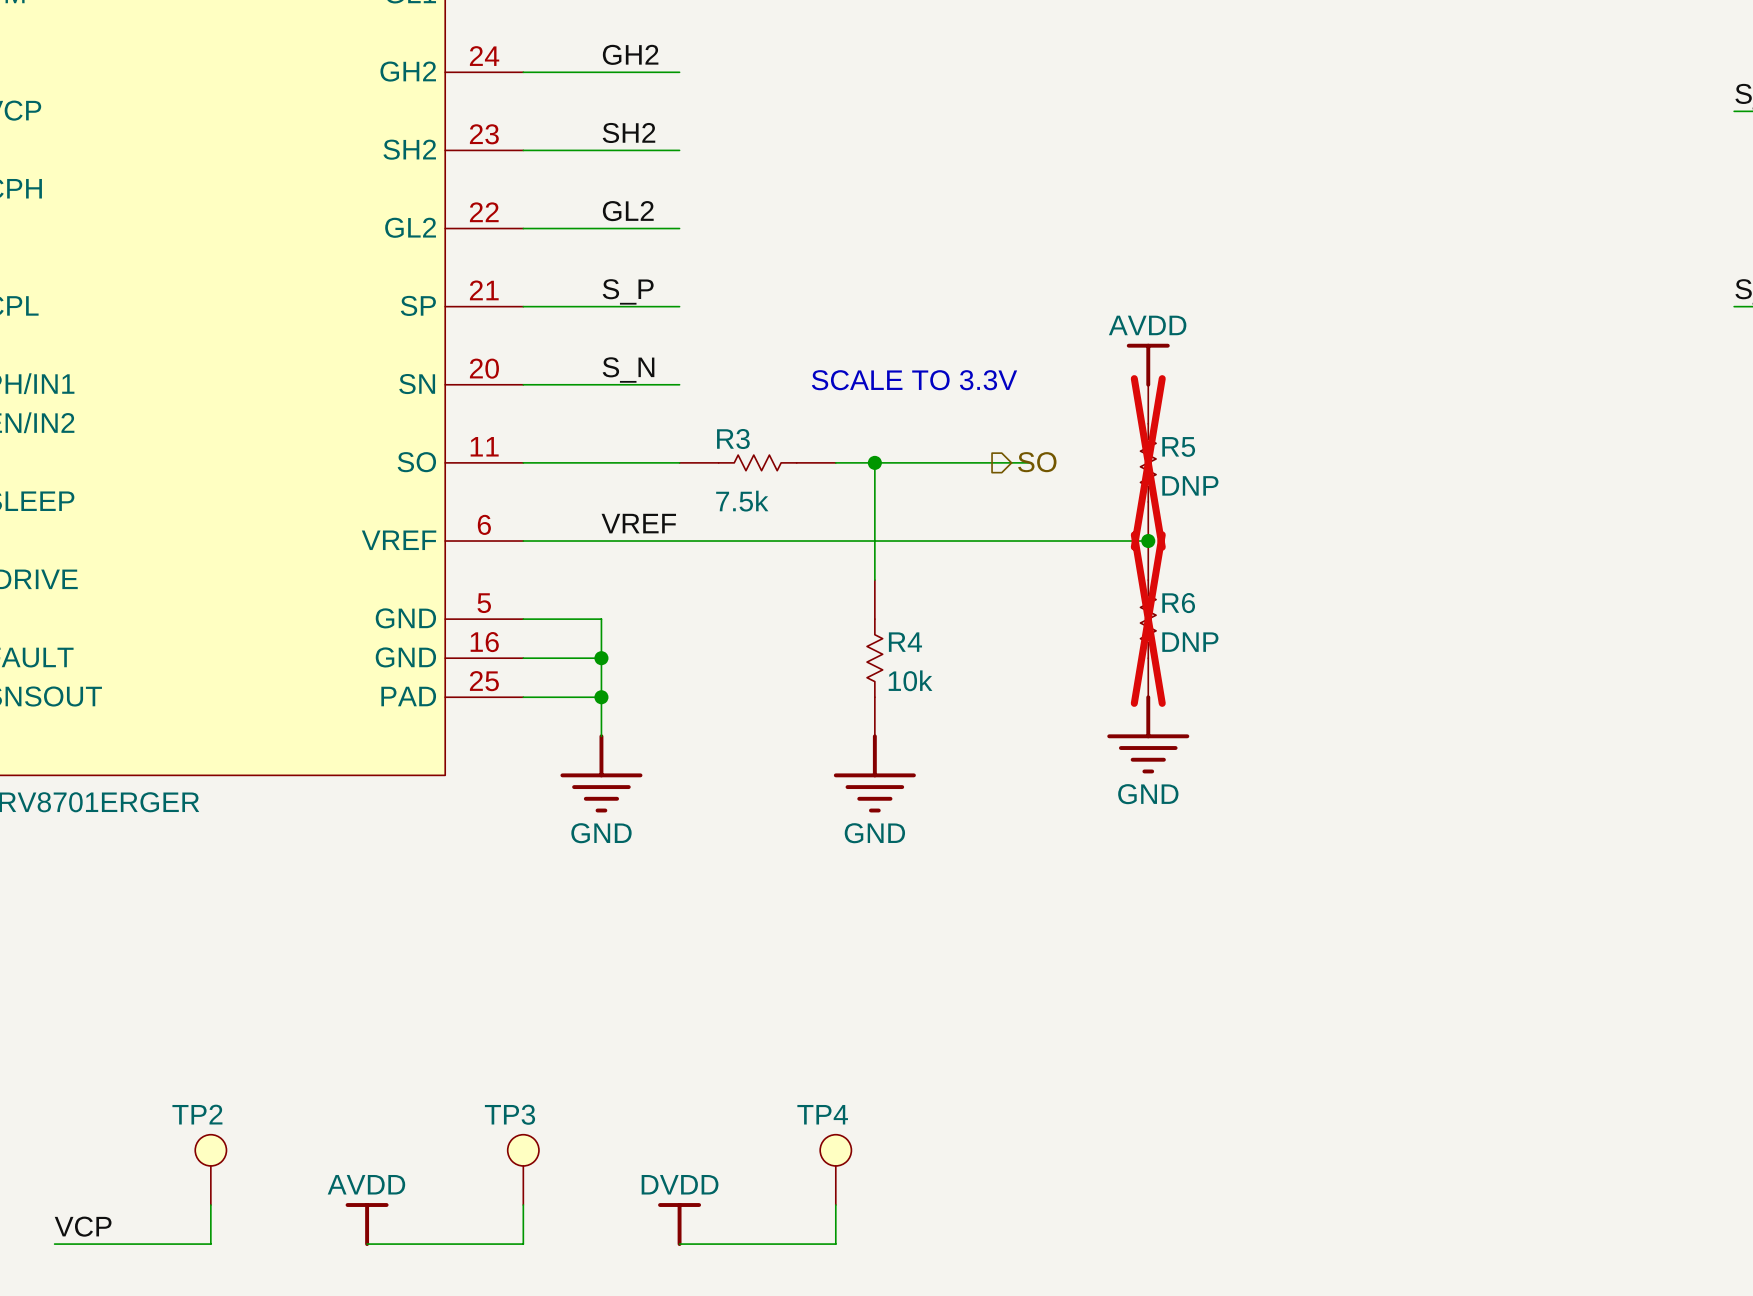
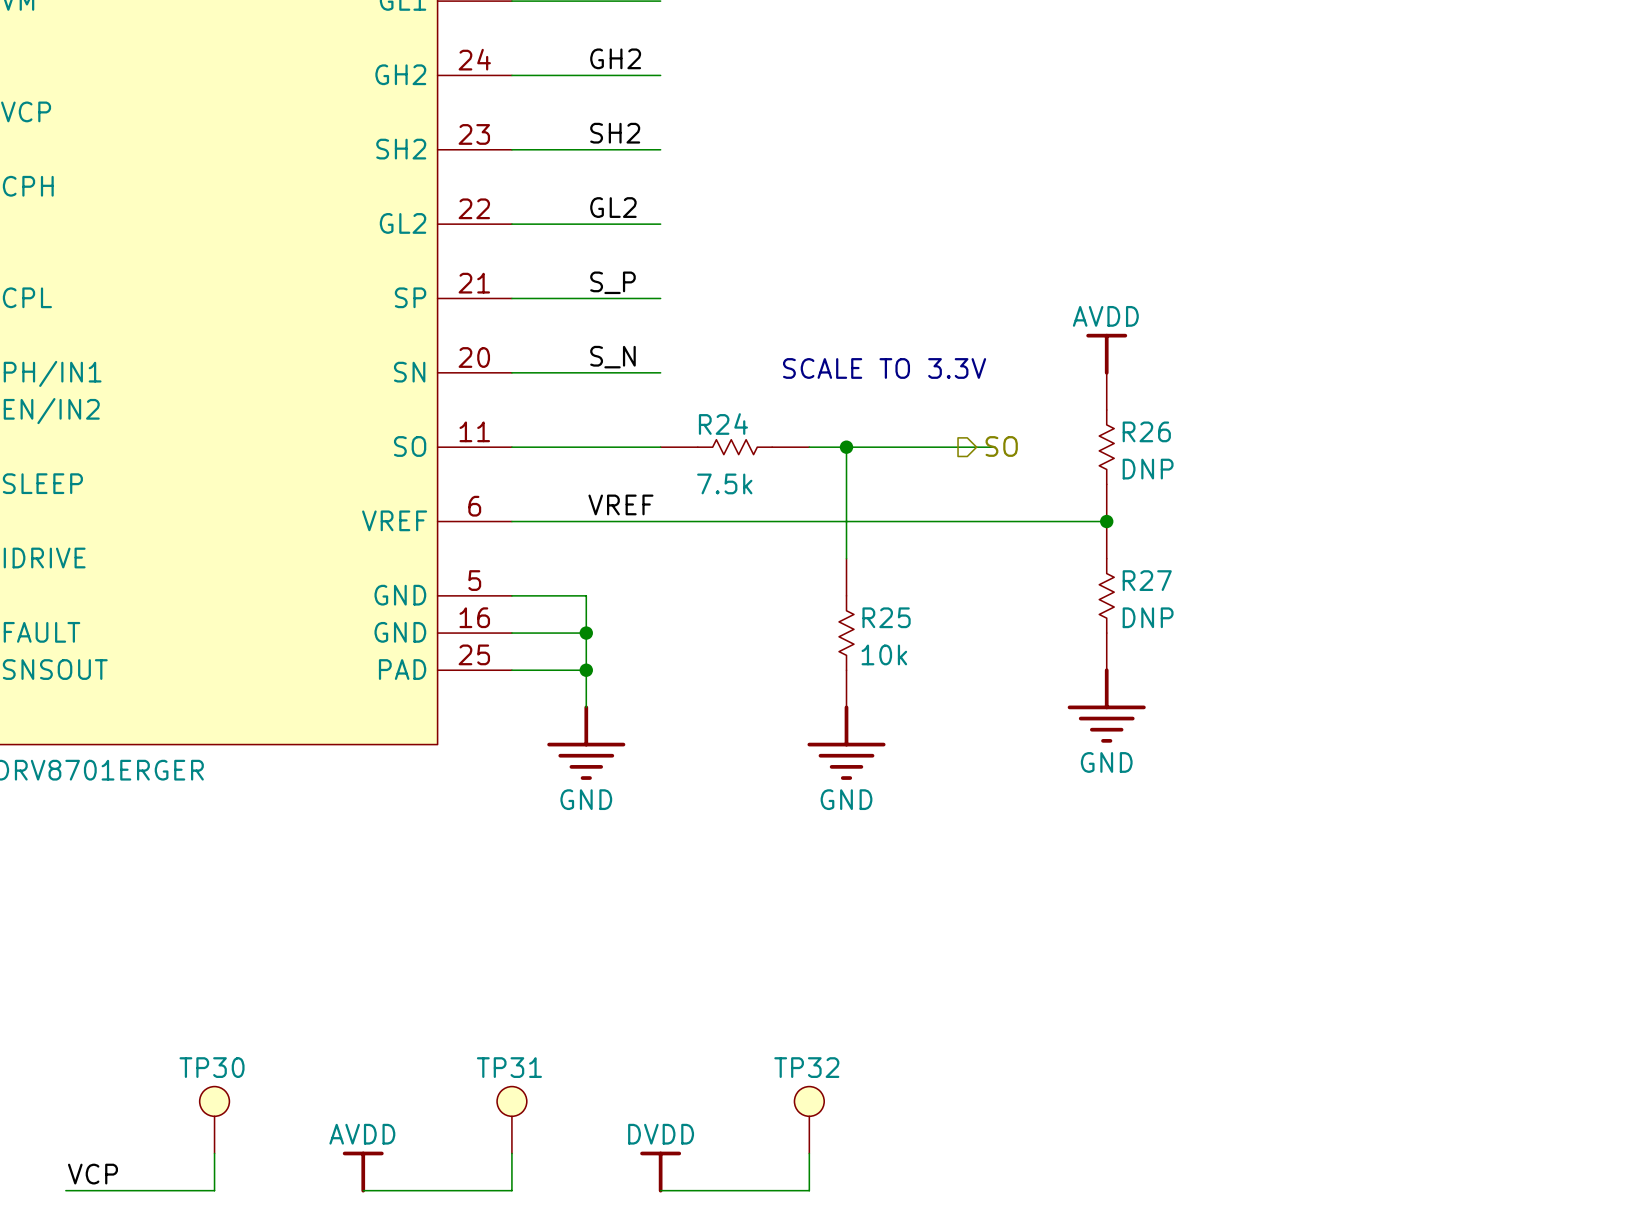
R3 name: R3 (733, 439) -> R24 (723, 424)
R5 name: R5 (1178, 446) -> R26 (1146, 431)
R5 do-not-place cross: (1148, 462) -> none
R6 name: R6 (1178, 603) -> R27 (1147, 580)
R6 do-not-place cross: (1148, 619) -> none
R4 name: R4 (905, 642) -> R25 (886, 617)
TP2 name: TP2 (197, 1114) -> TP30 (212, 1067)
TP3 name: TP3 (509, 1114) -> TP31 (509, 1067)
TP4 name: TP4 (822, 1114) -> TP32 (806, 1067)

